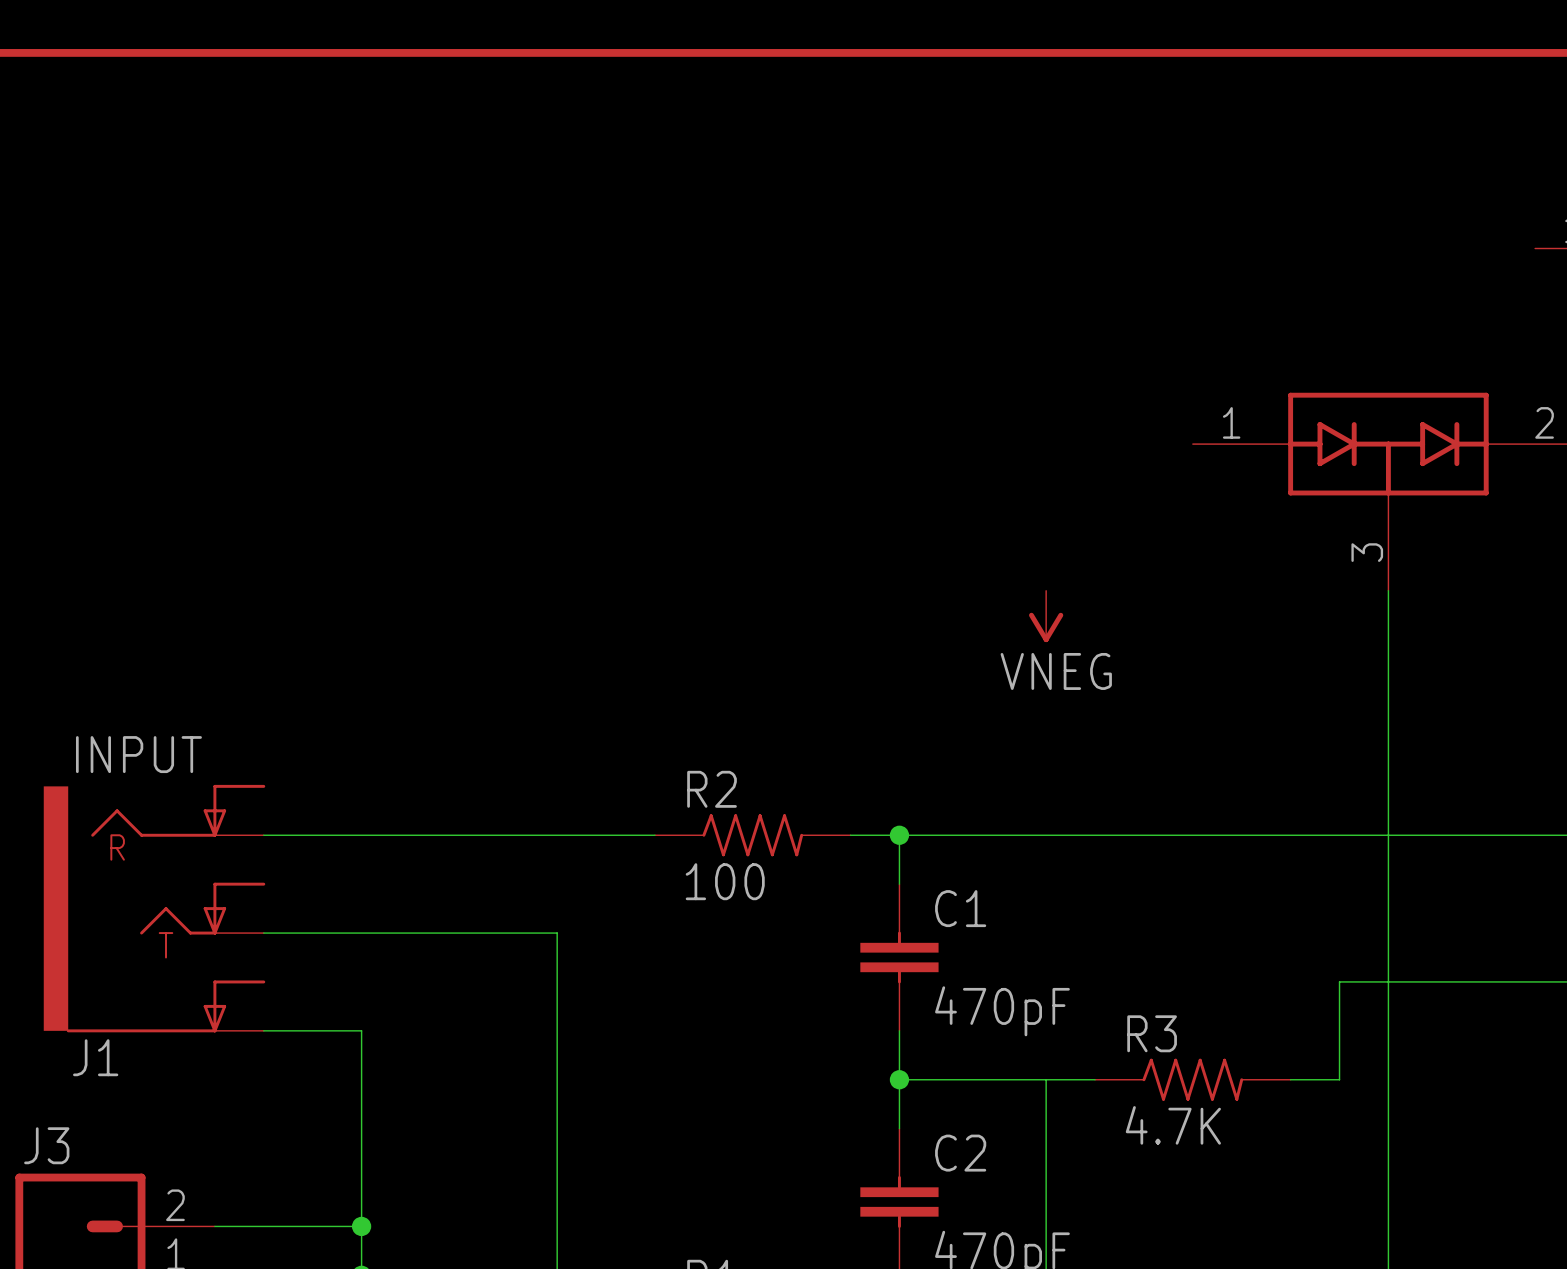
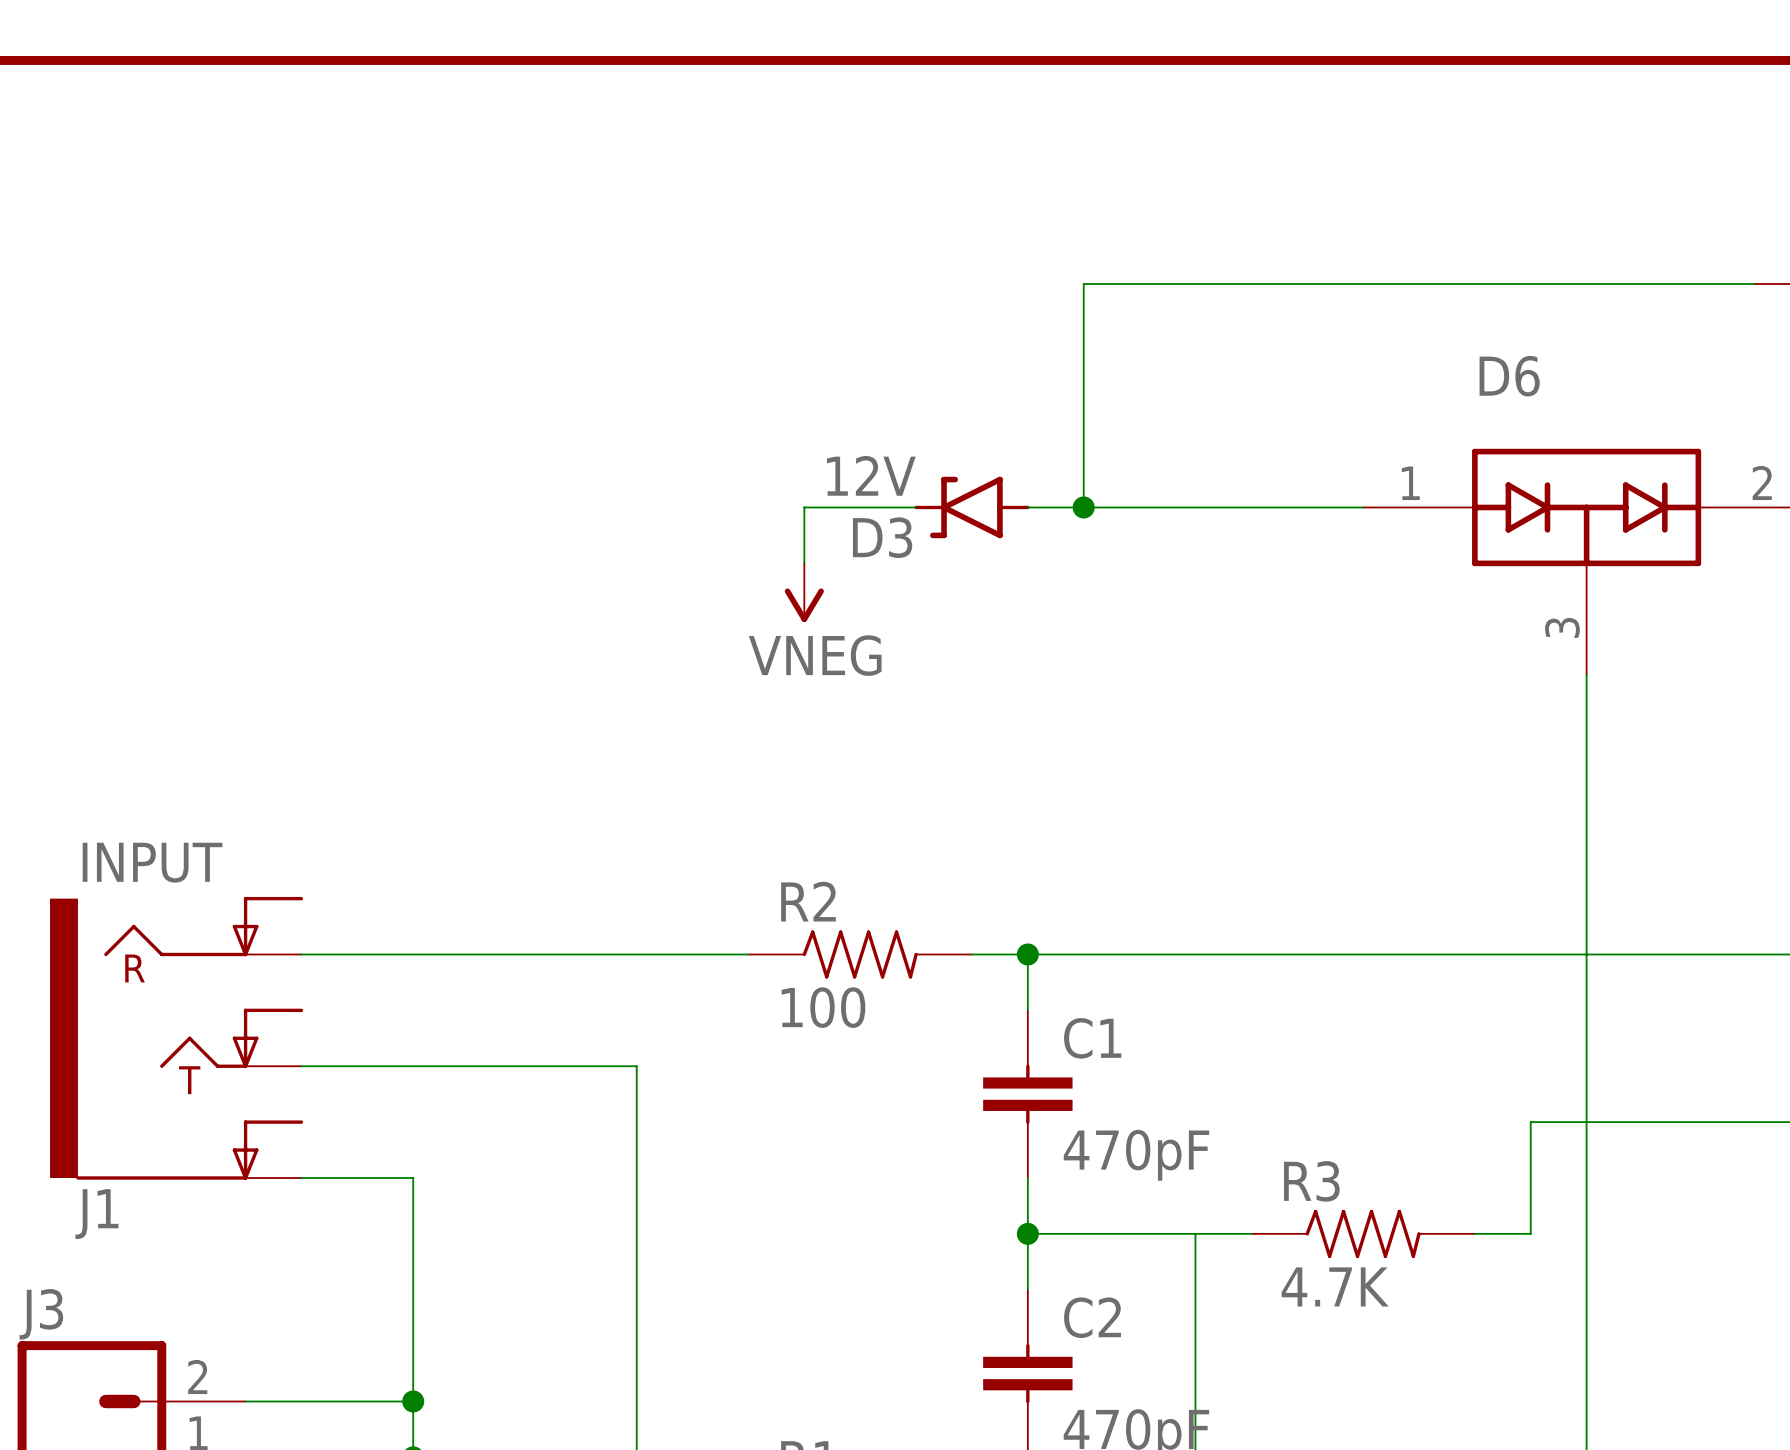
wire: none -> (1754, 283) (1083, 283) (1083, 507)
D6 name: none -> D6 (1509, 376)
wire: none -> (916, 507) (804, 507) (804, 563)
D3: none -> 12V (971, 507)
wire: none -> (1027, 507) (1363, 507)
junction: none -> (1083, 507)
power symbol position: VNEG (1046, 616) -> VNEG (804, 592)

